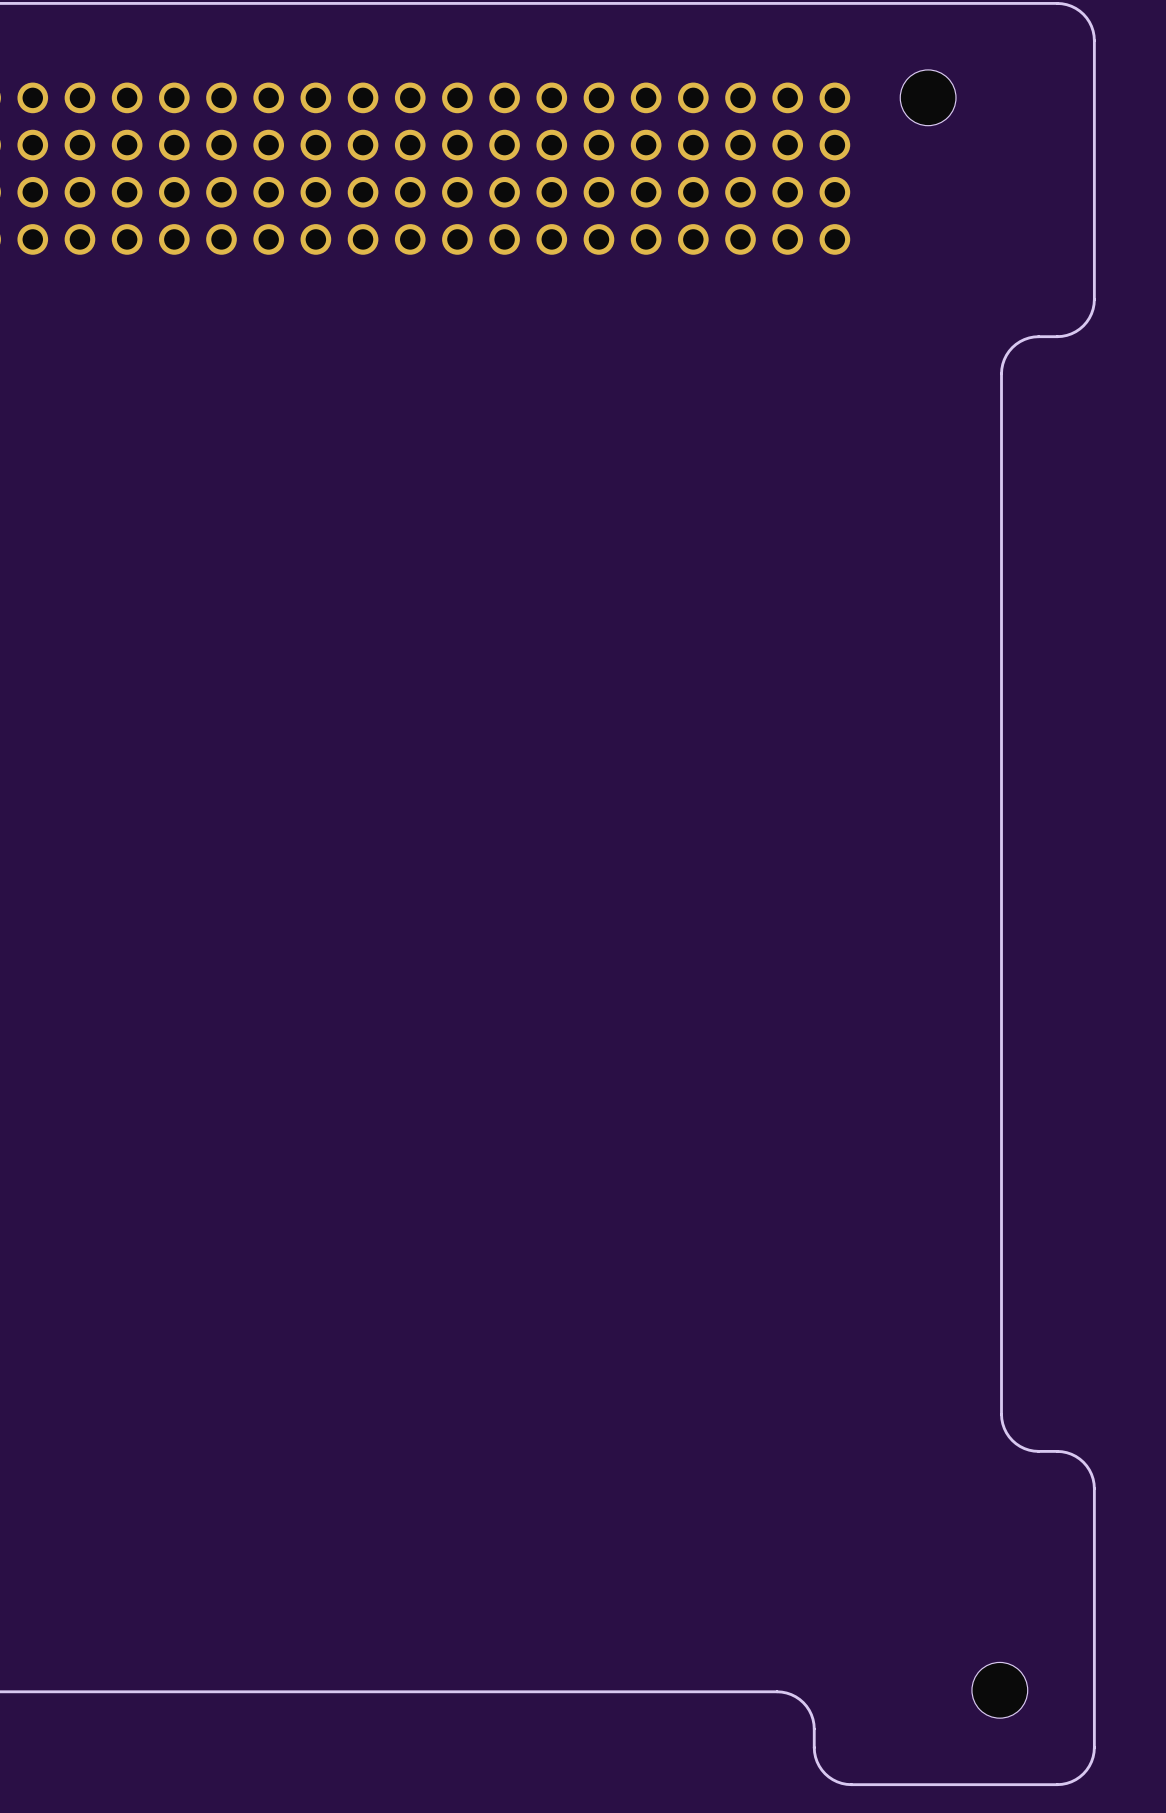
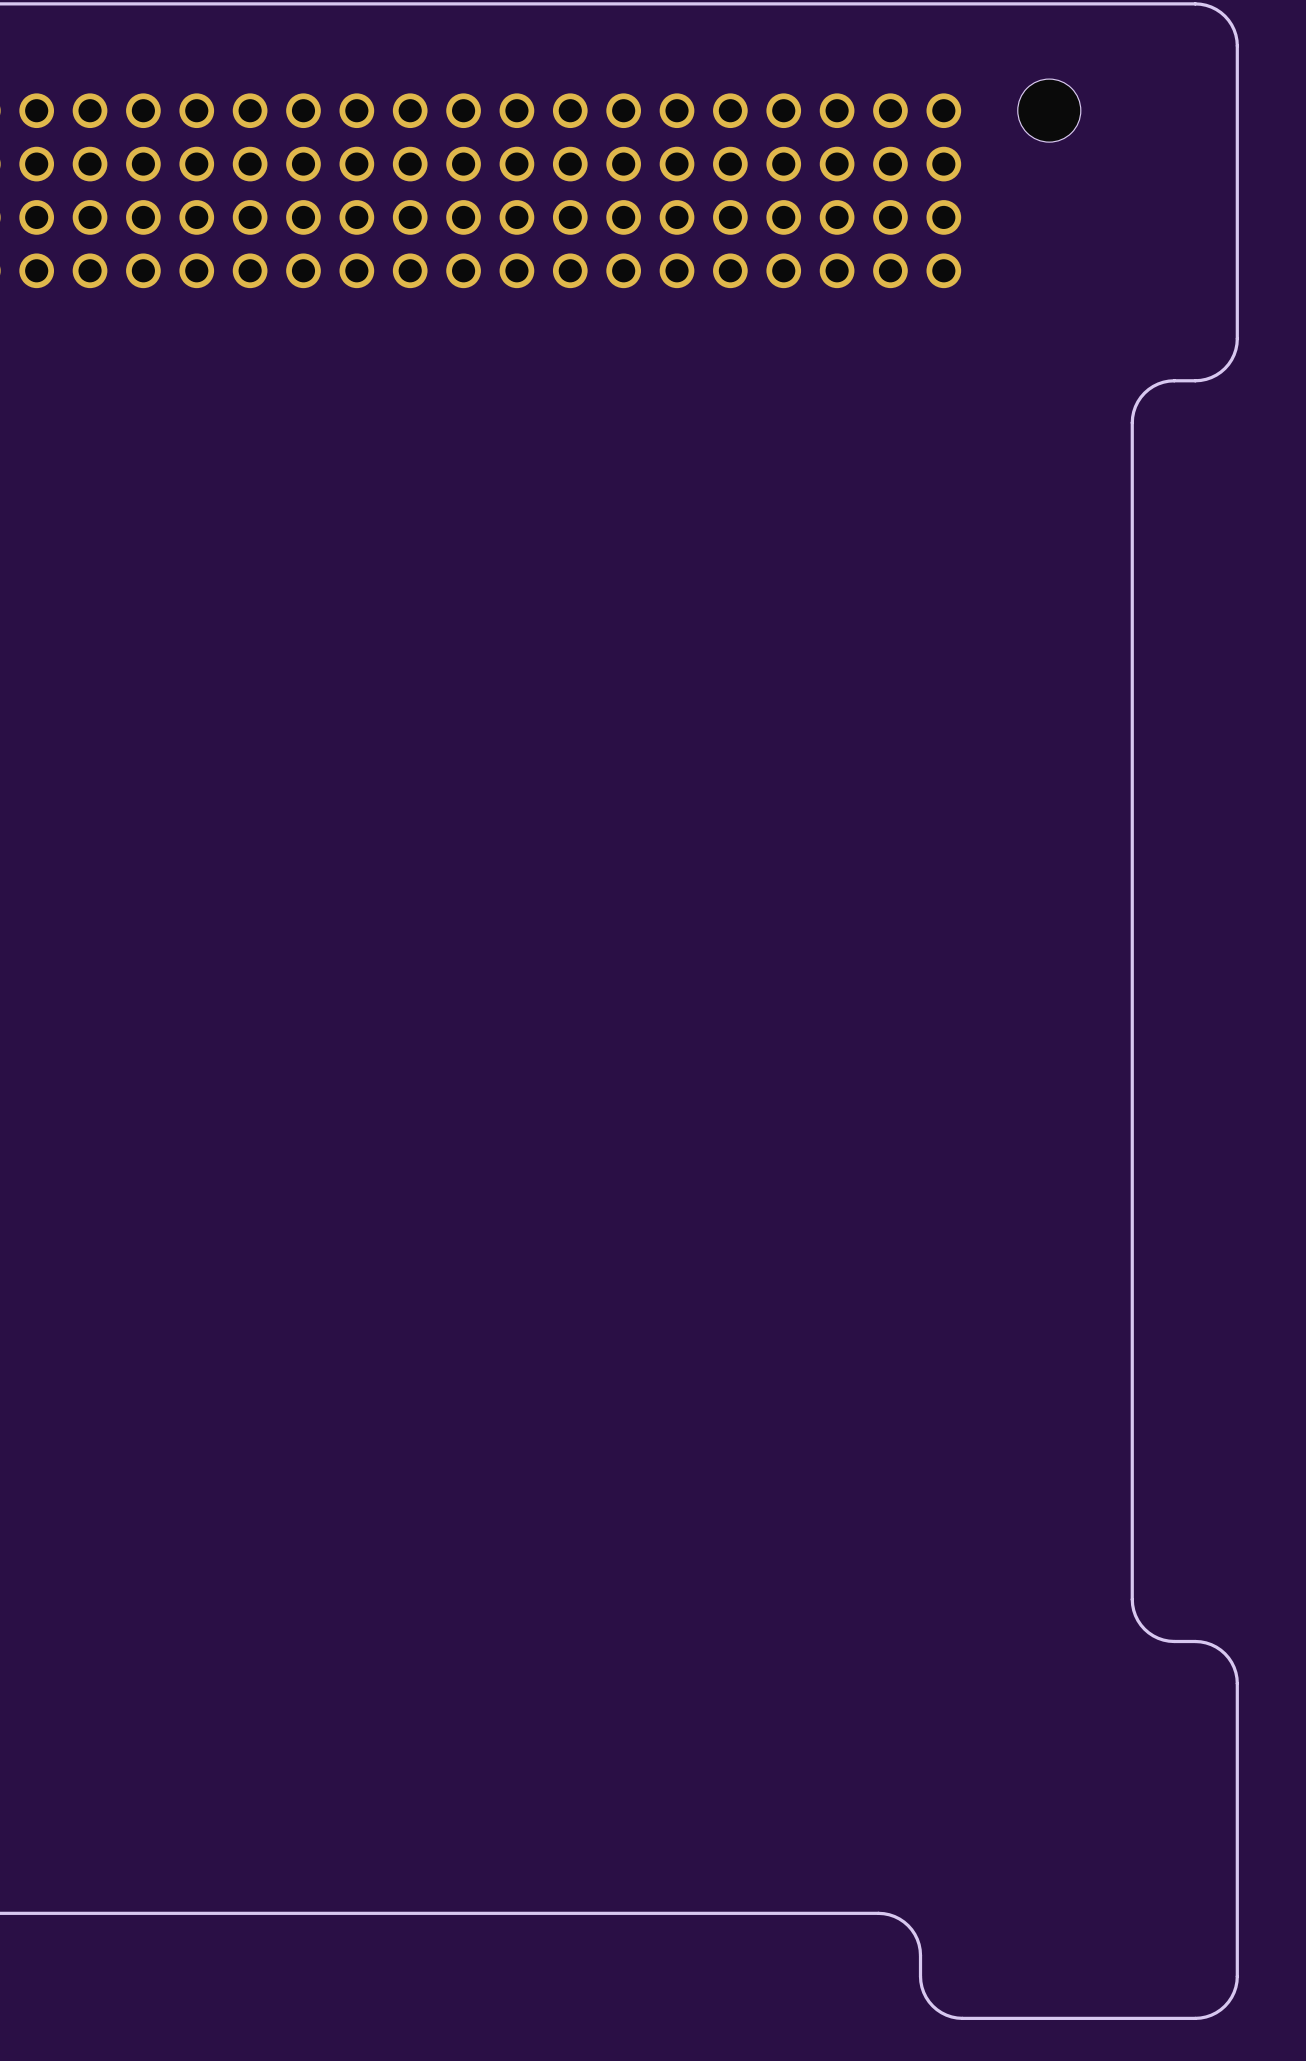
hole: (999, 1690) -> none

